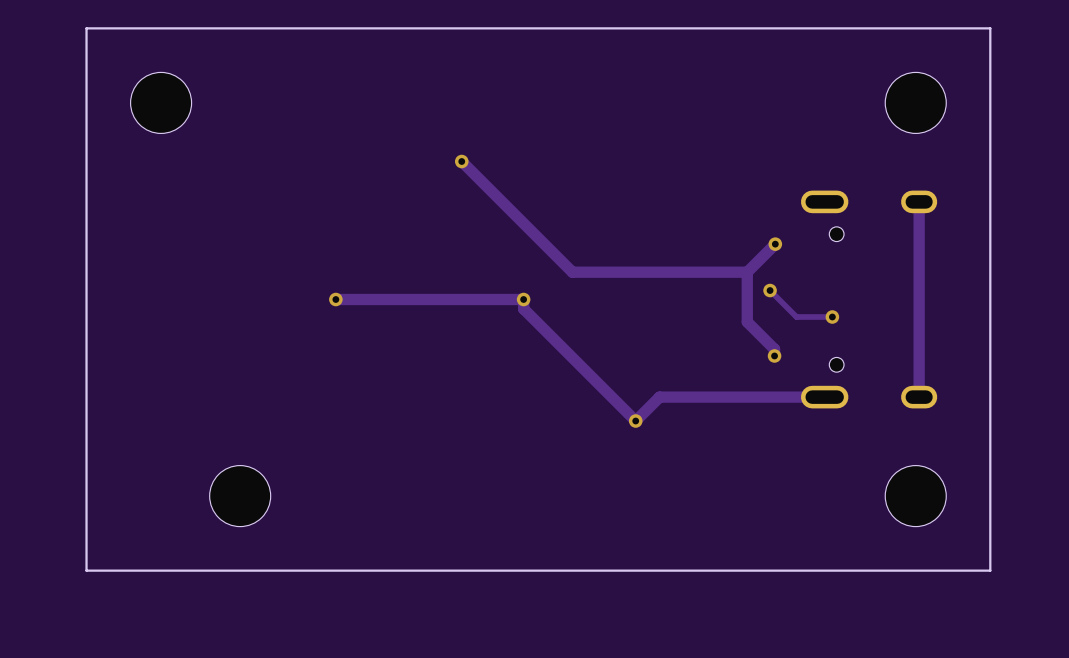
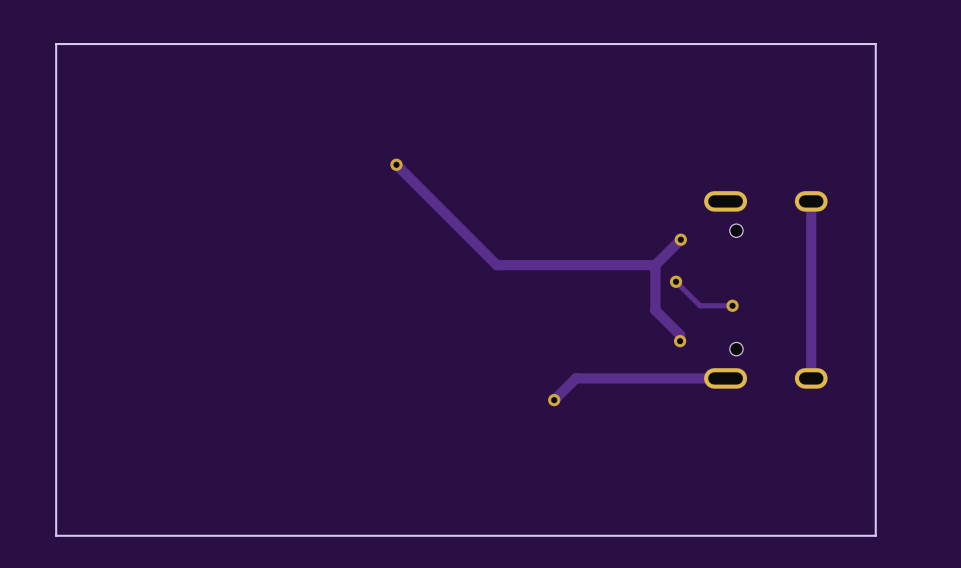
part: (161, 102) -> none
part: (915, 102) -> none
track: (335, 299) (523, 299) (523, 308) (635, 421) -> none
via: (335, 299) -> none
via: (523, 299) -> none
part: (240, 496) -> none
part: (915, 496) -> none

